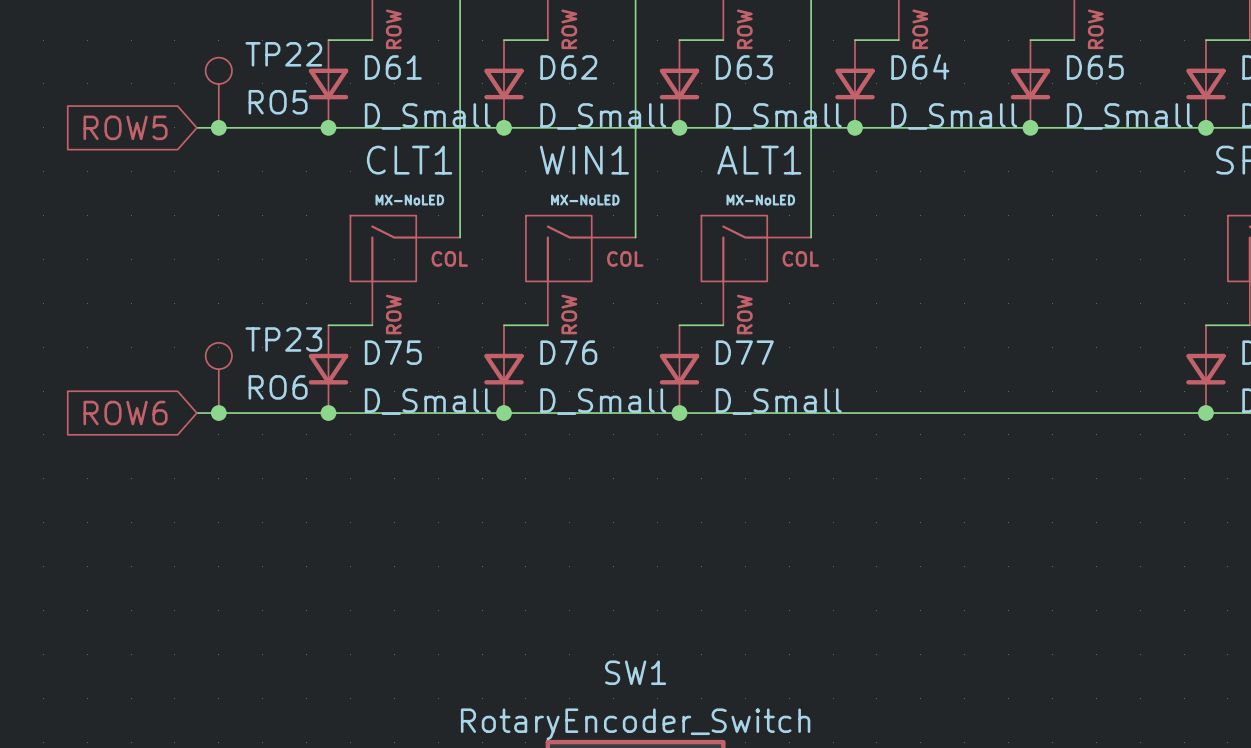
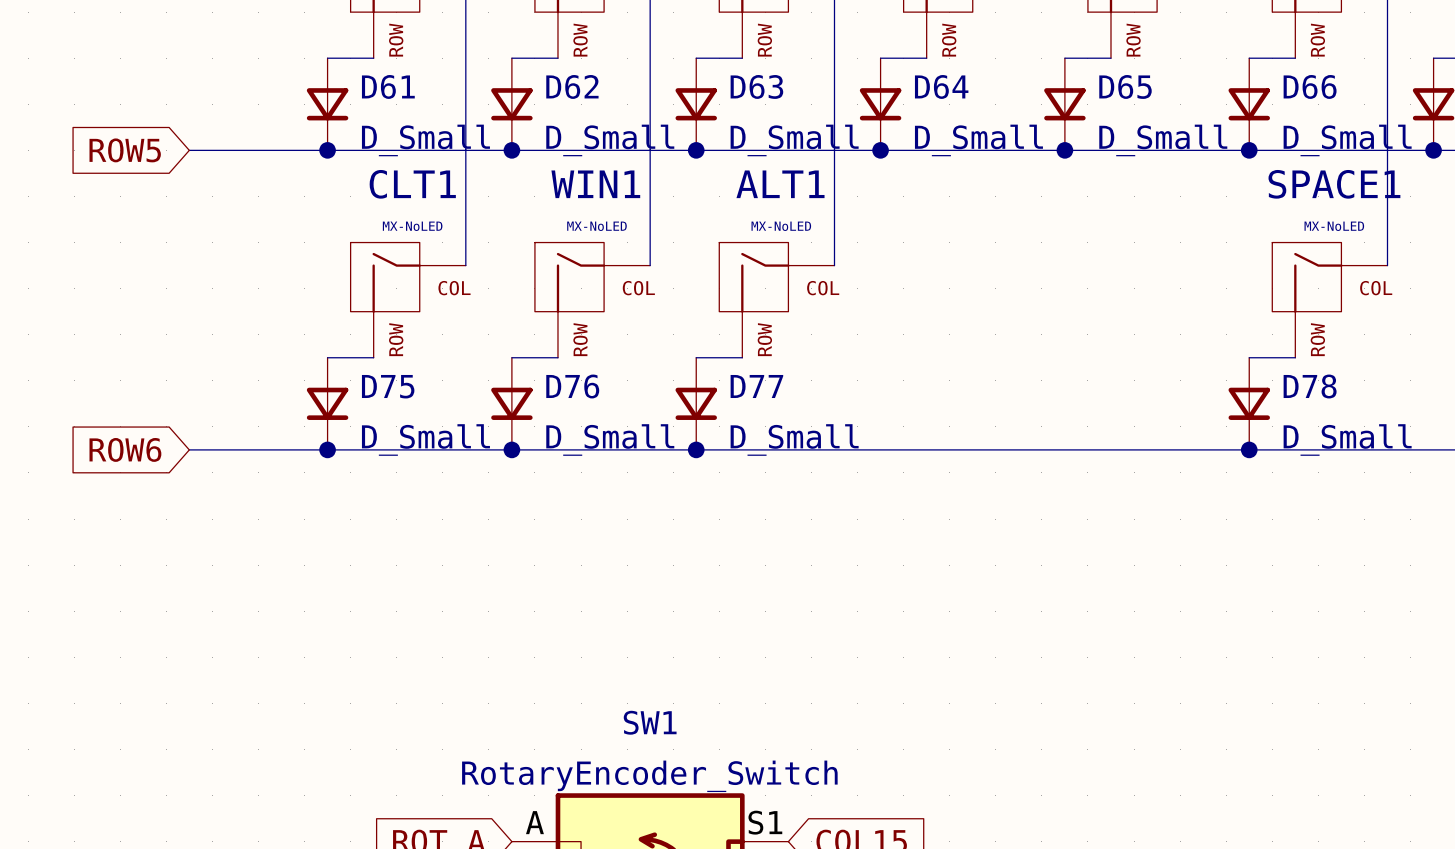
TP22: RO5 (218, 92) -> none
junction: (218, 127) -> none
TP23: RO6 (218, 377) -> none
junction: (218, 413) -> none

